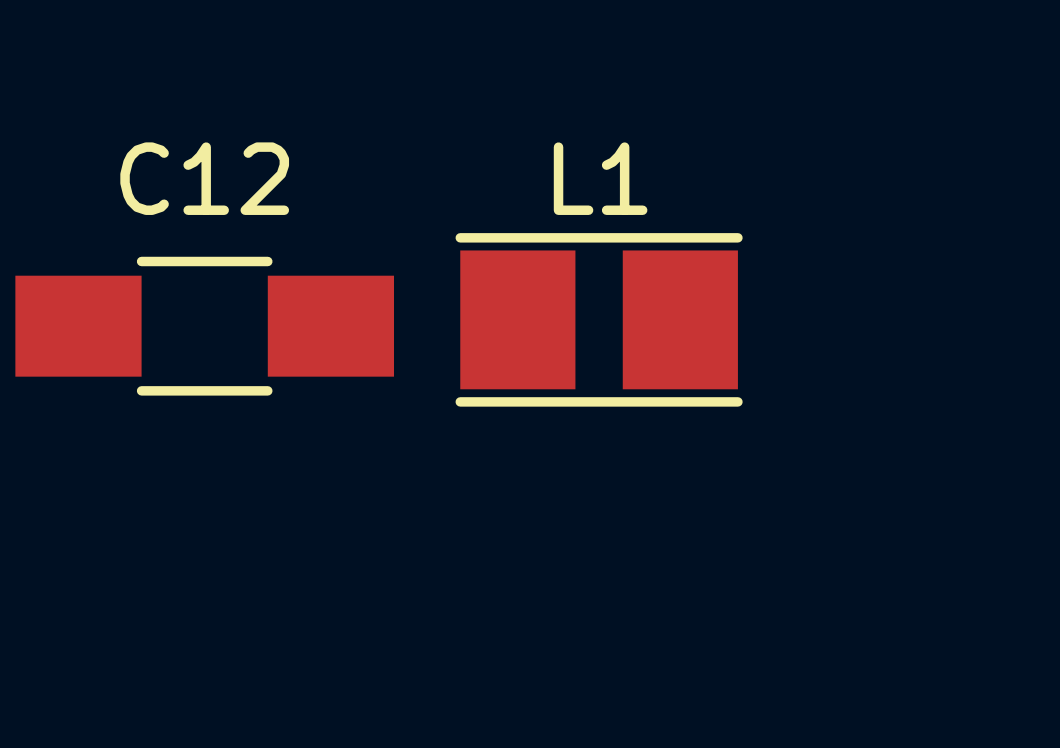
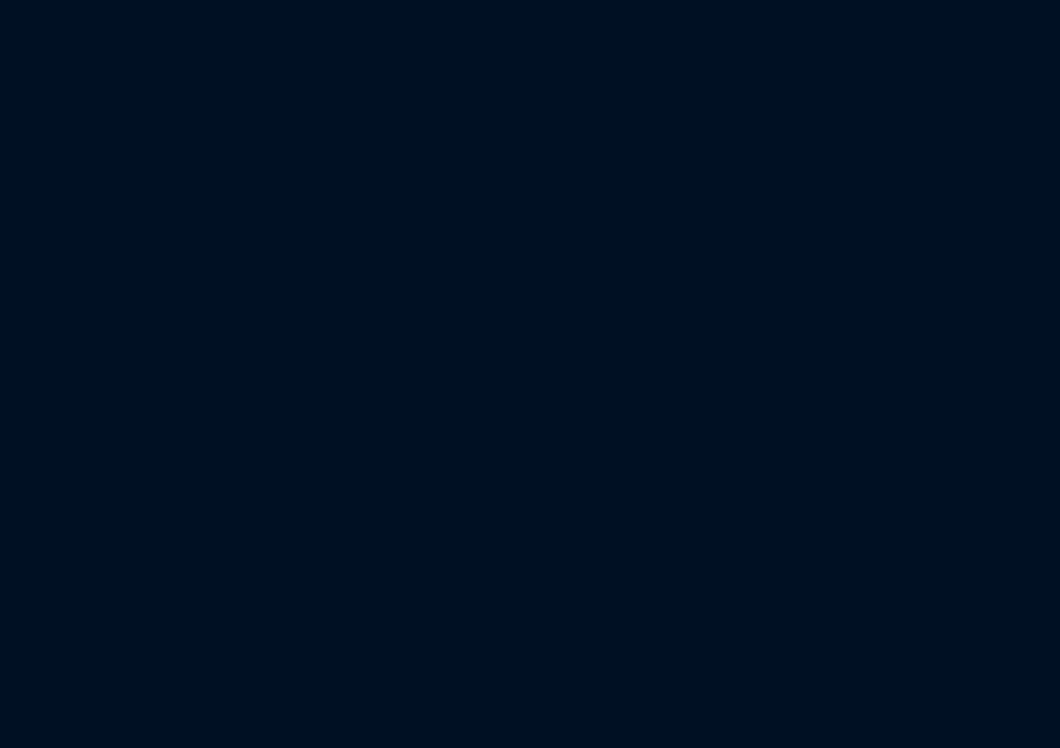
L1: (599, 319) -> none
C12: (204, 326) -> none

